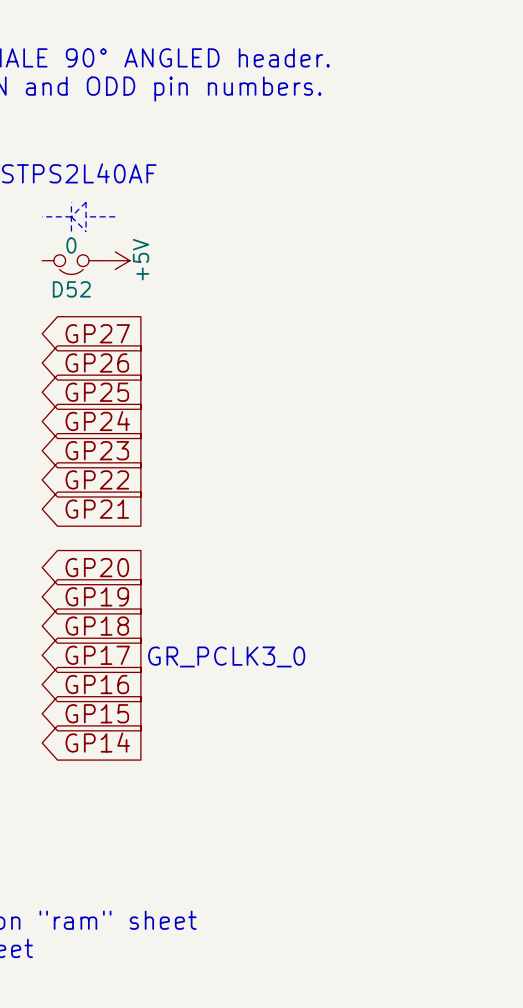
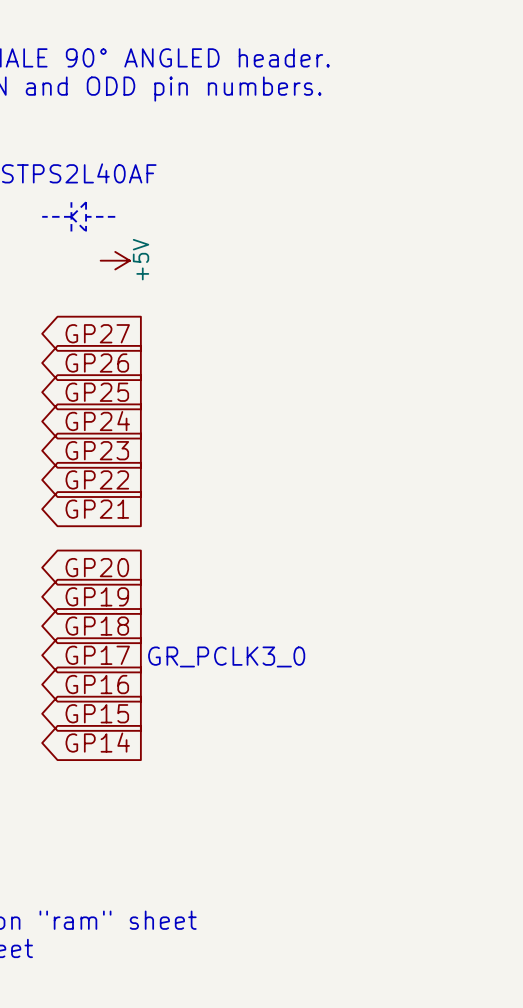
D52: 0 (71, 264) -> none

